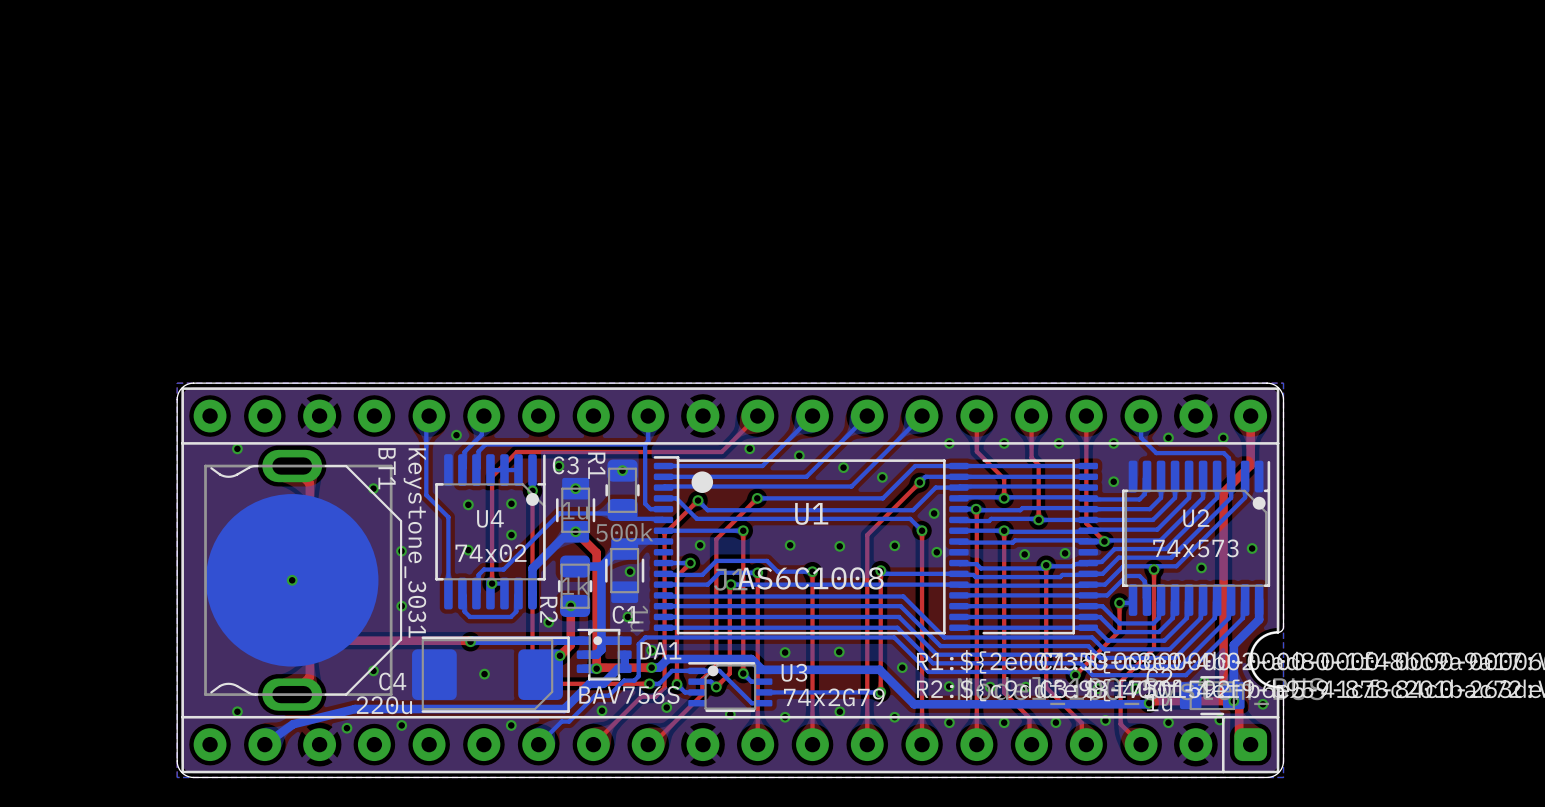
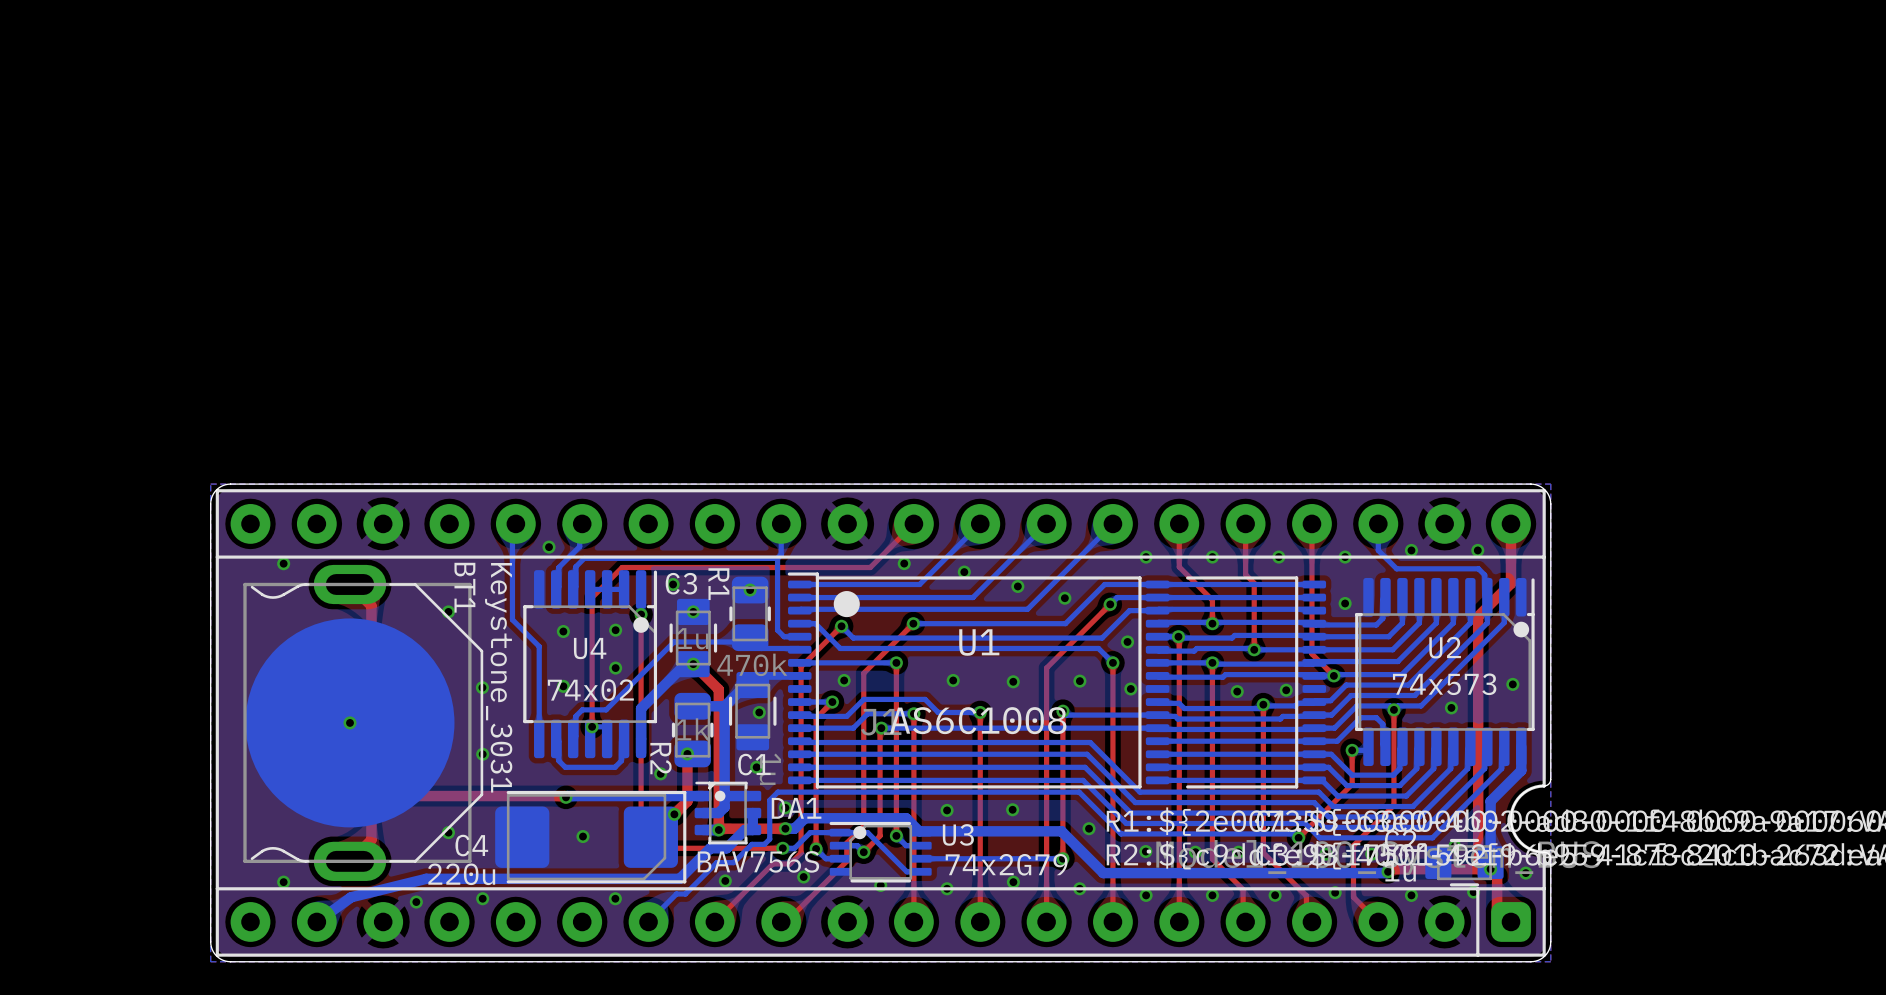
R1 value: 500k (624, 532) -> 470k (752, 664)

